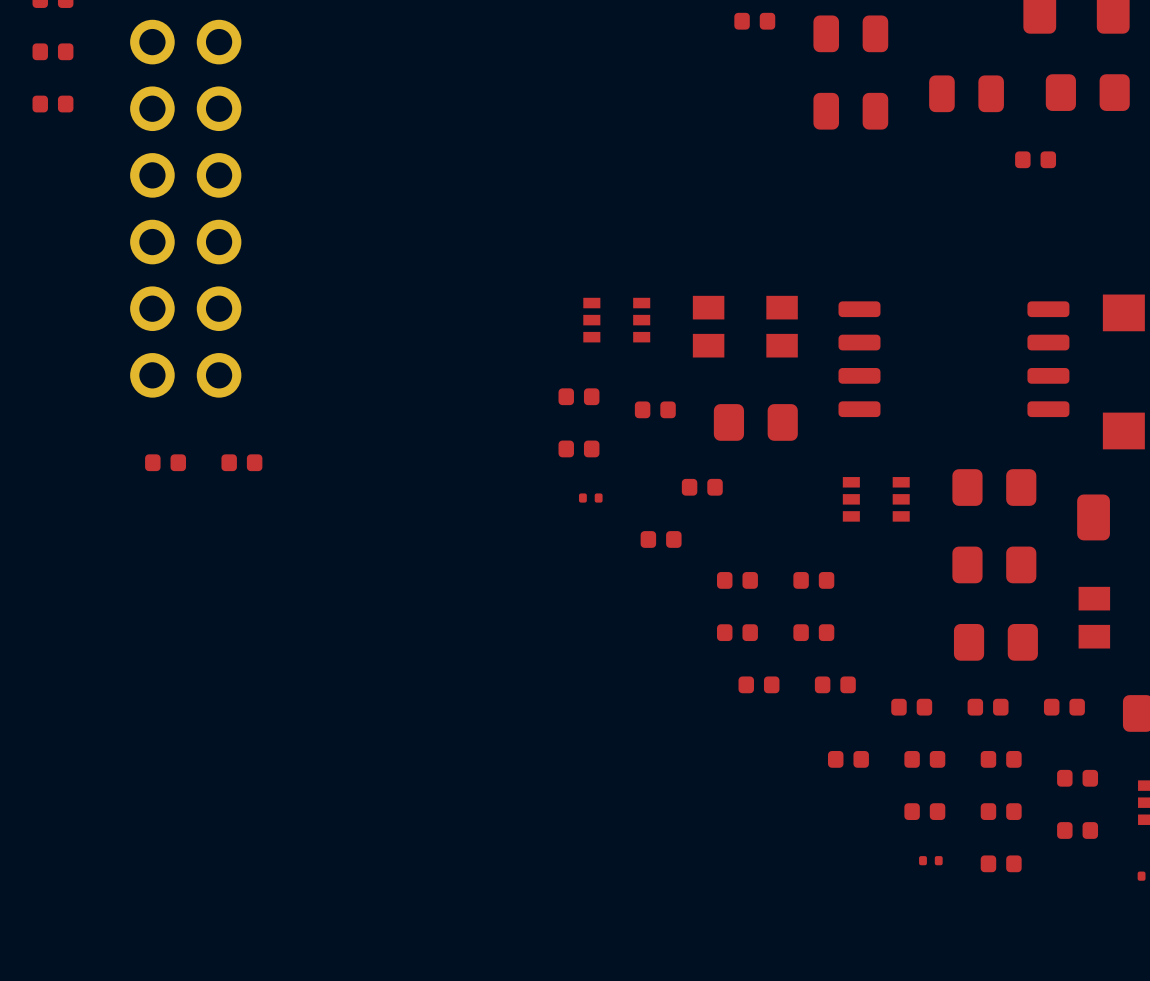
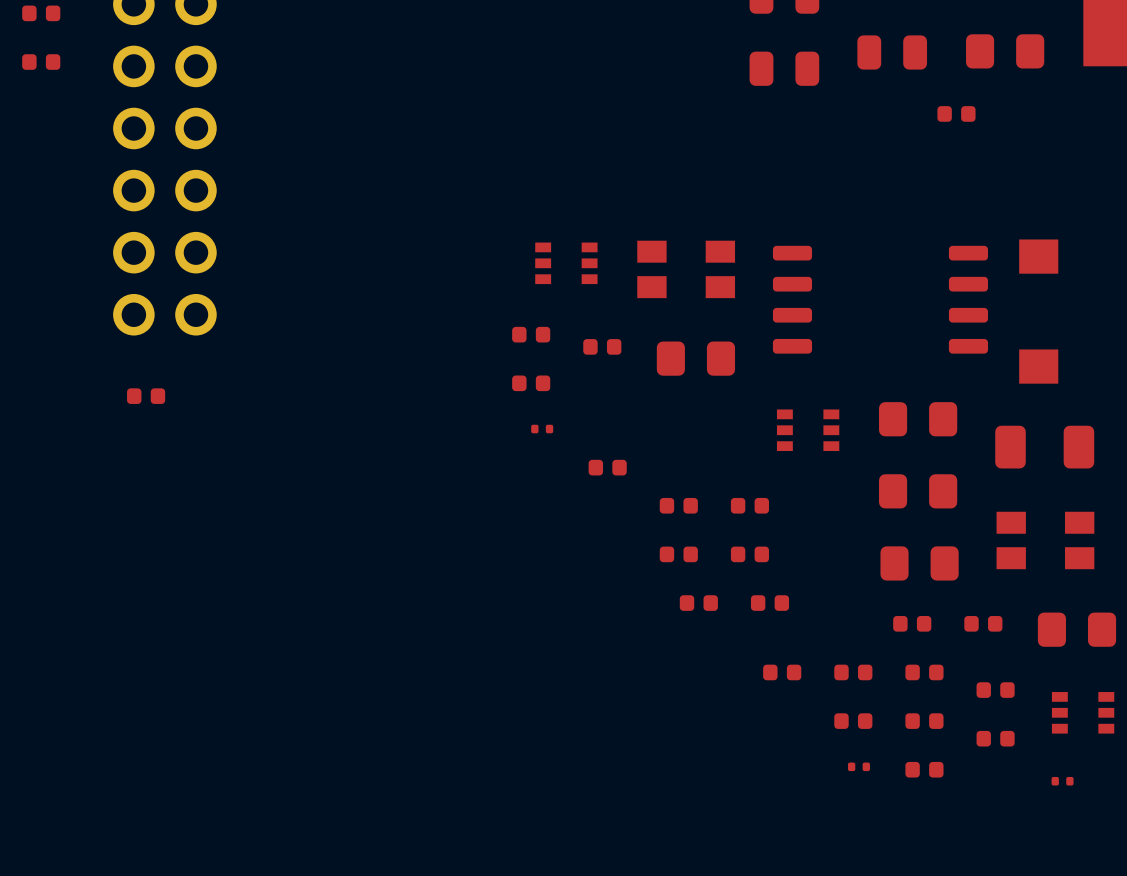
part: (241, 462) -> none
part: (702, 487) -> none
part: (911, 707) -> none

